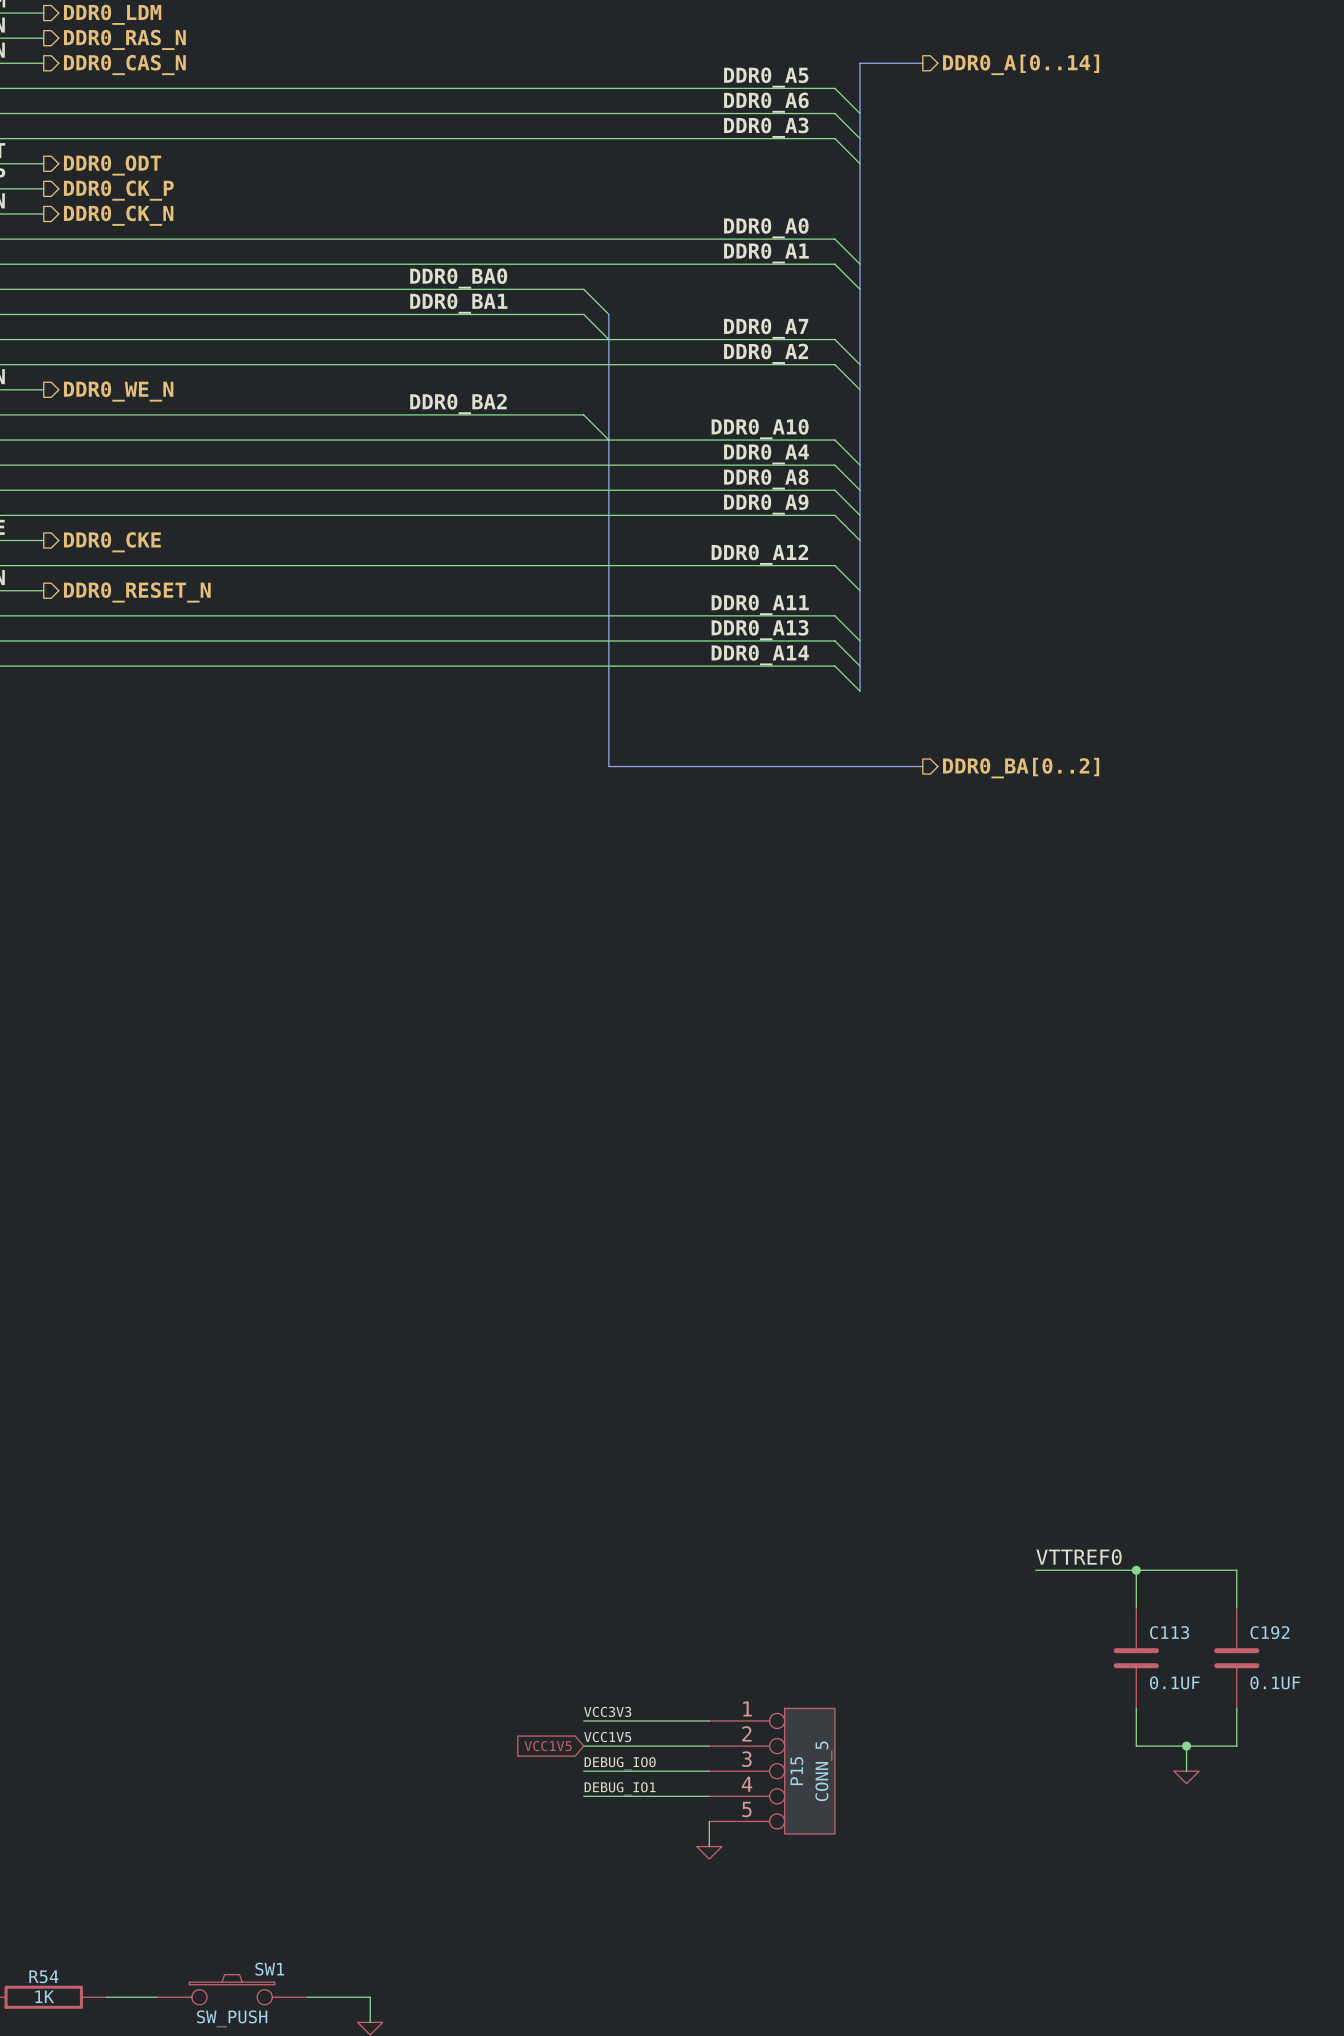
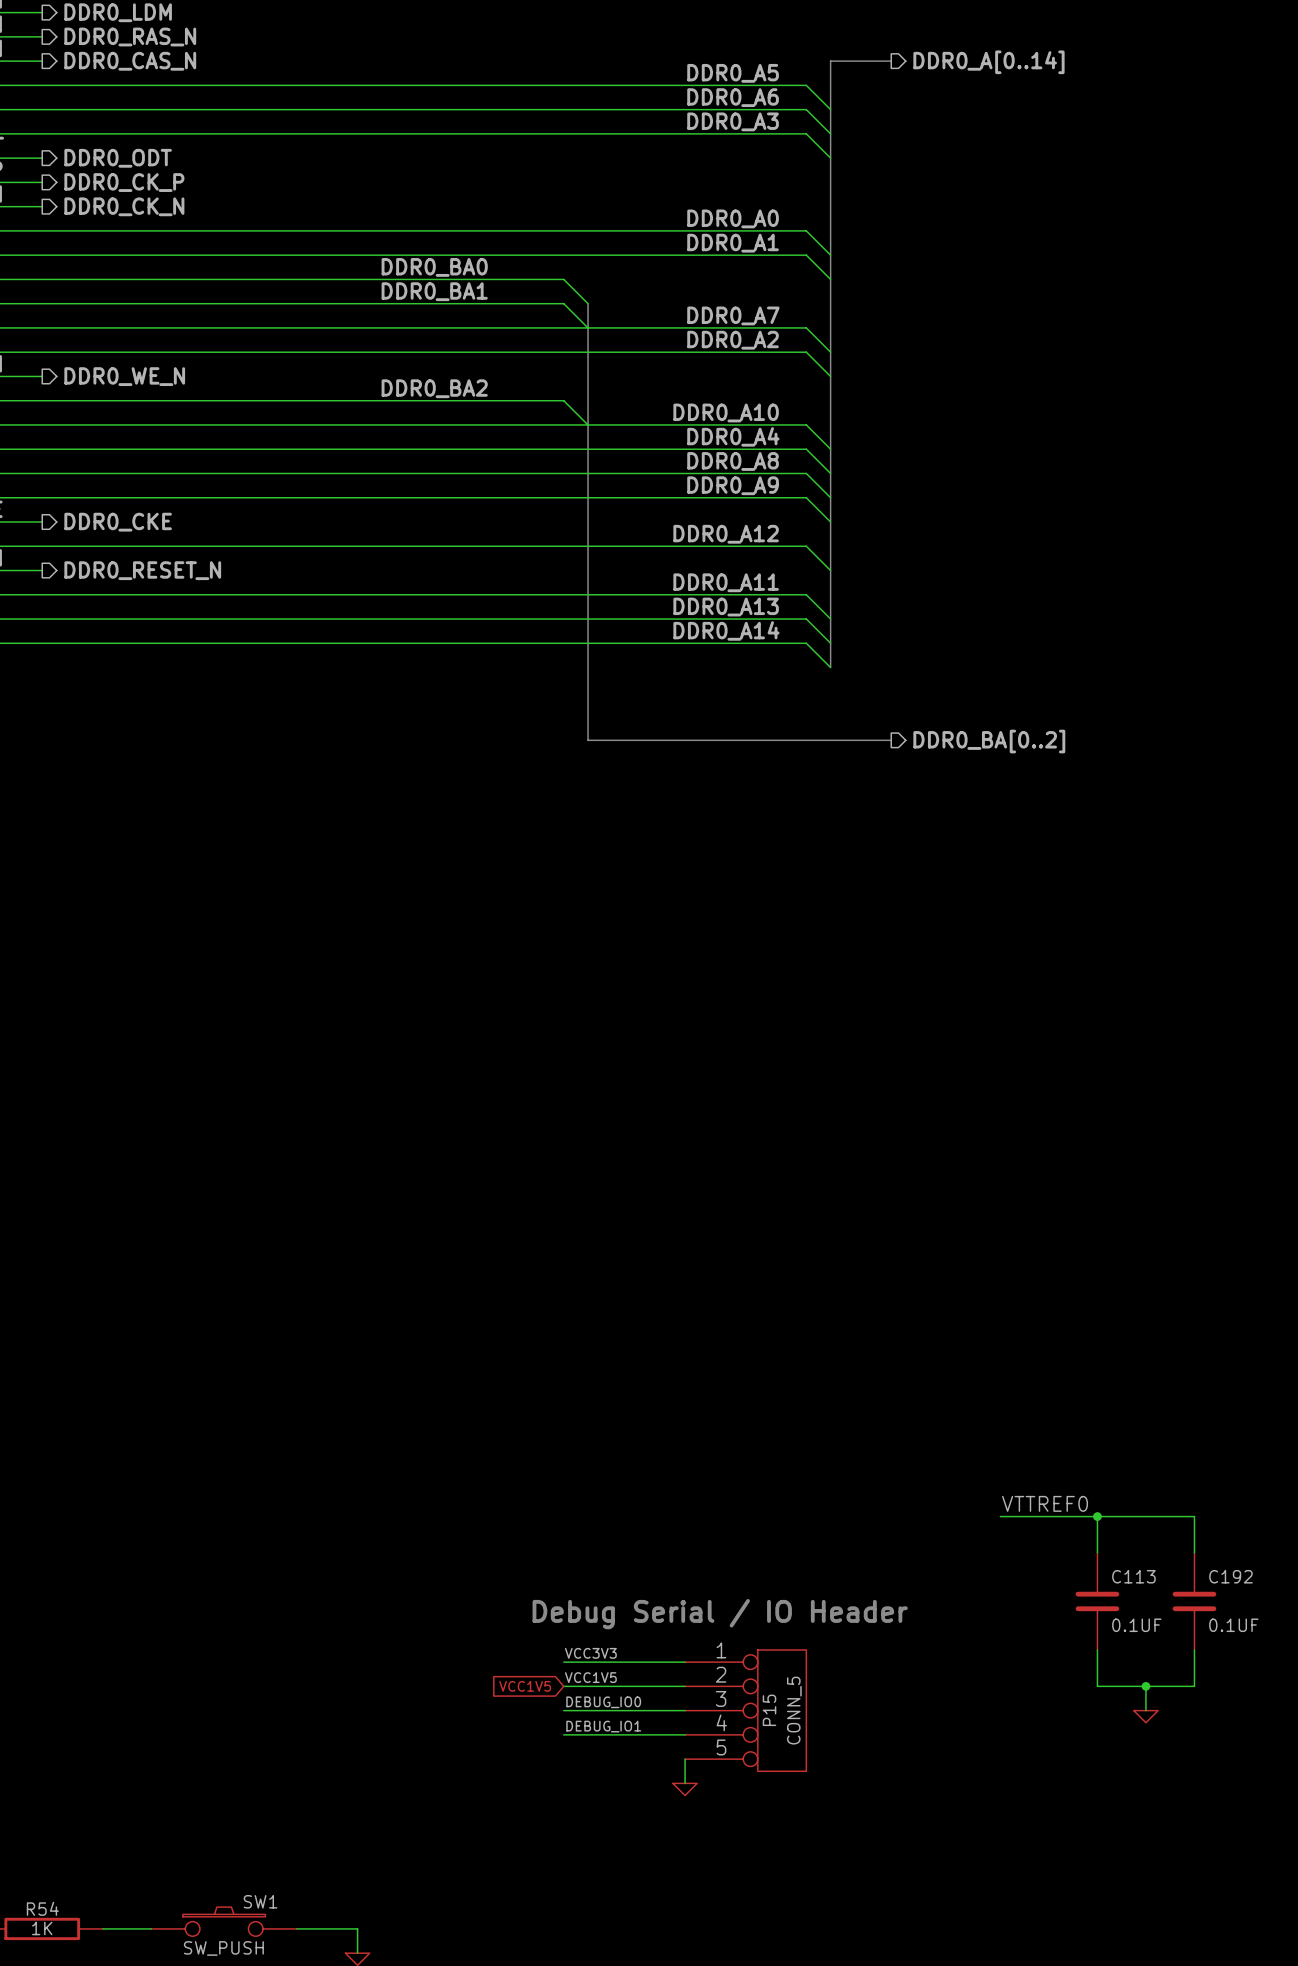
text: none -> Debug Serial / IO Header (720, 1614)

